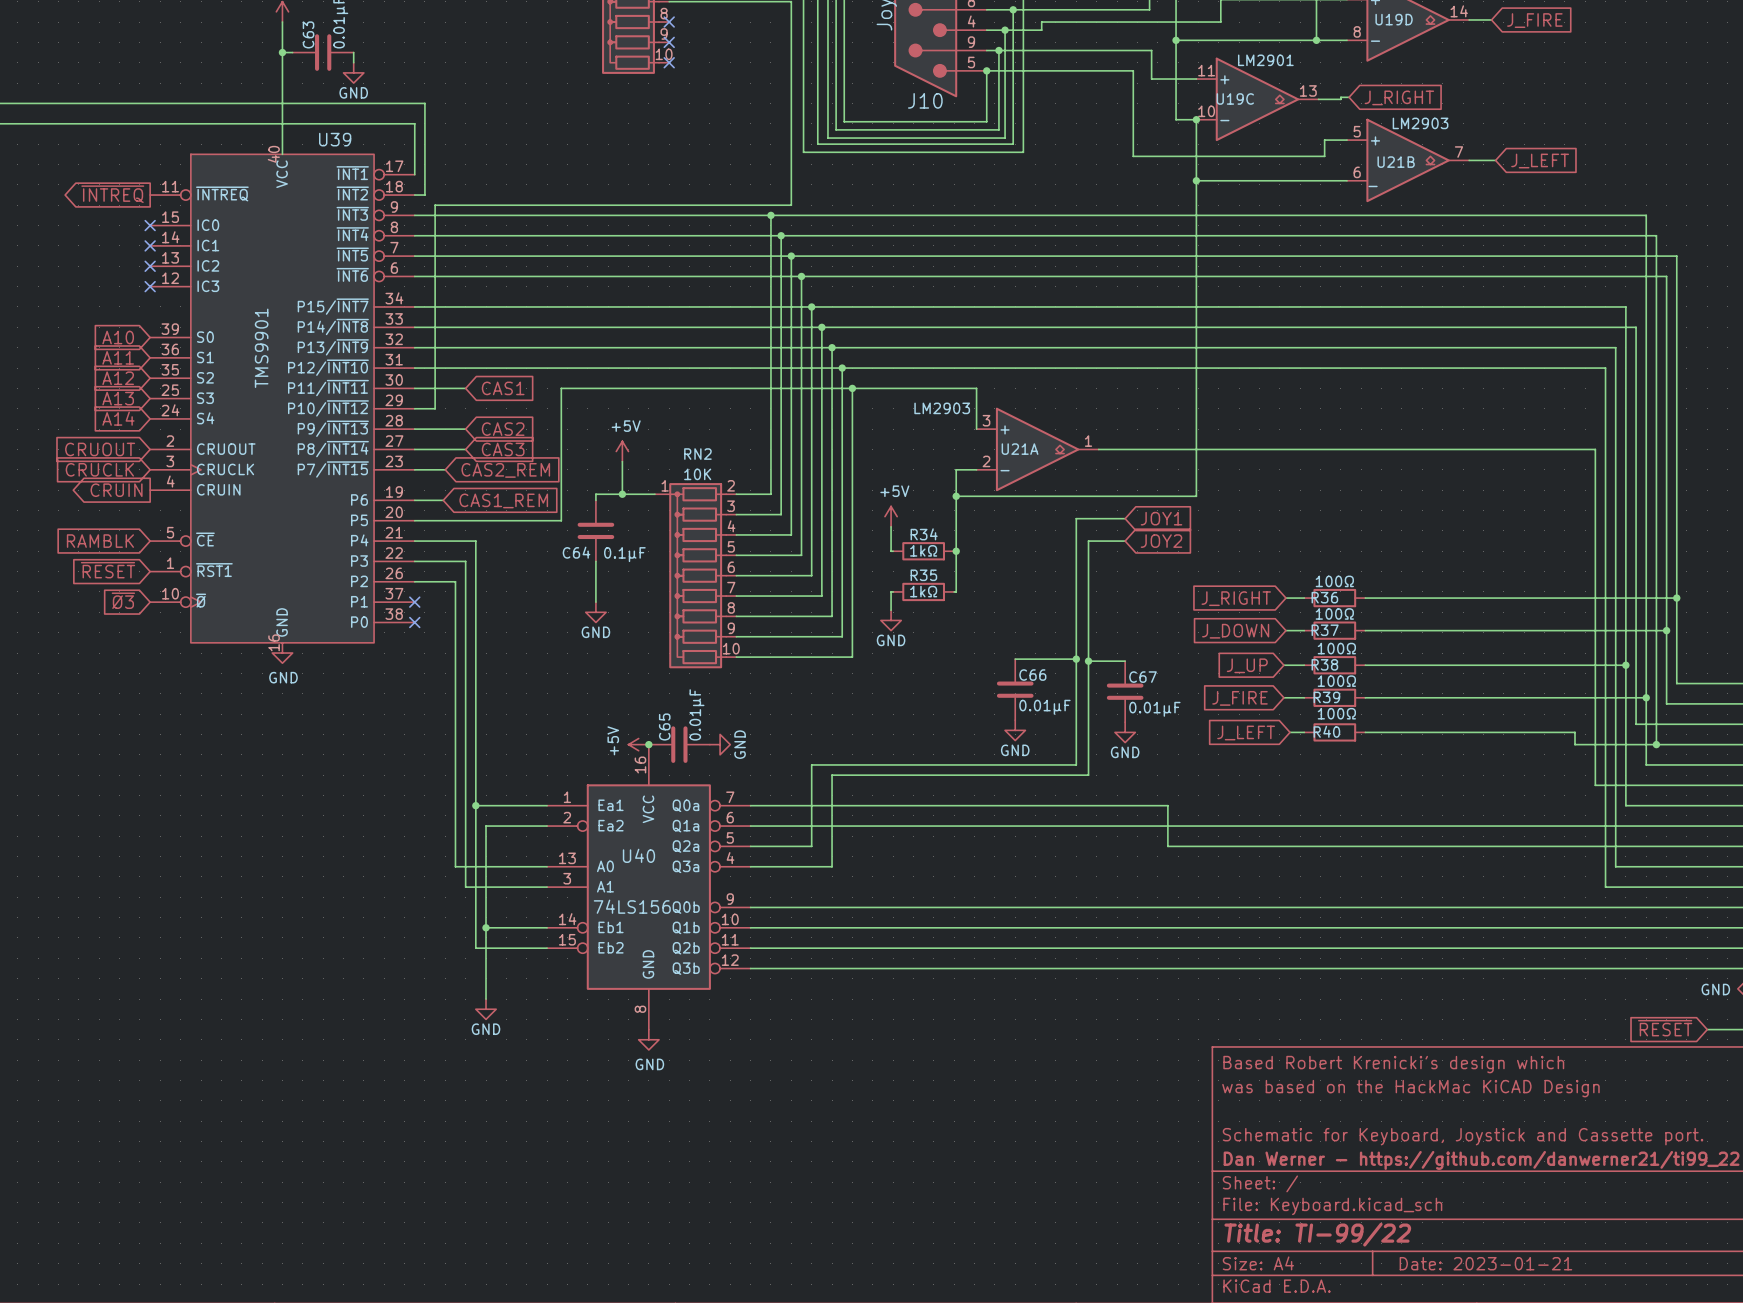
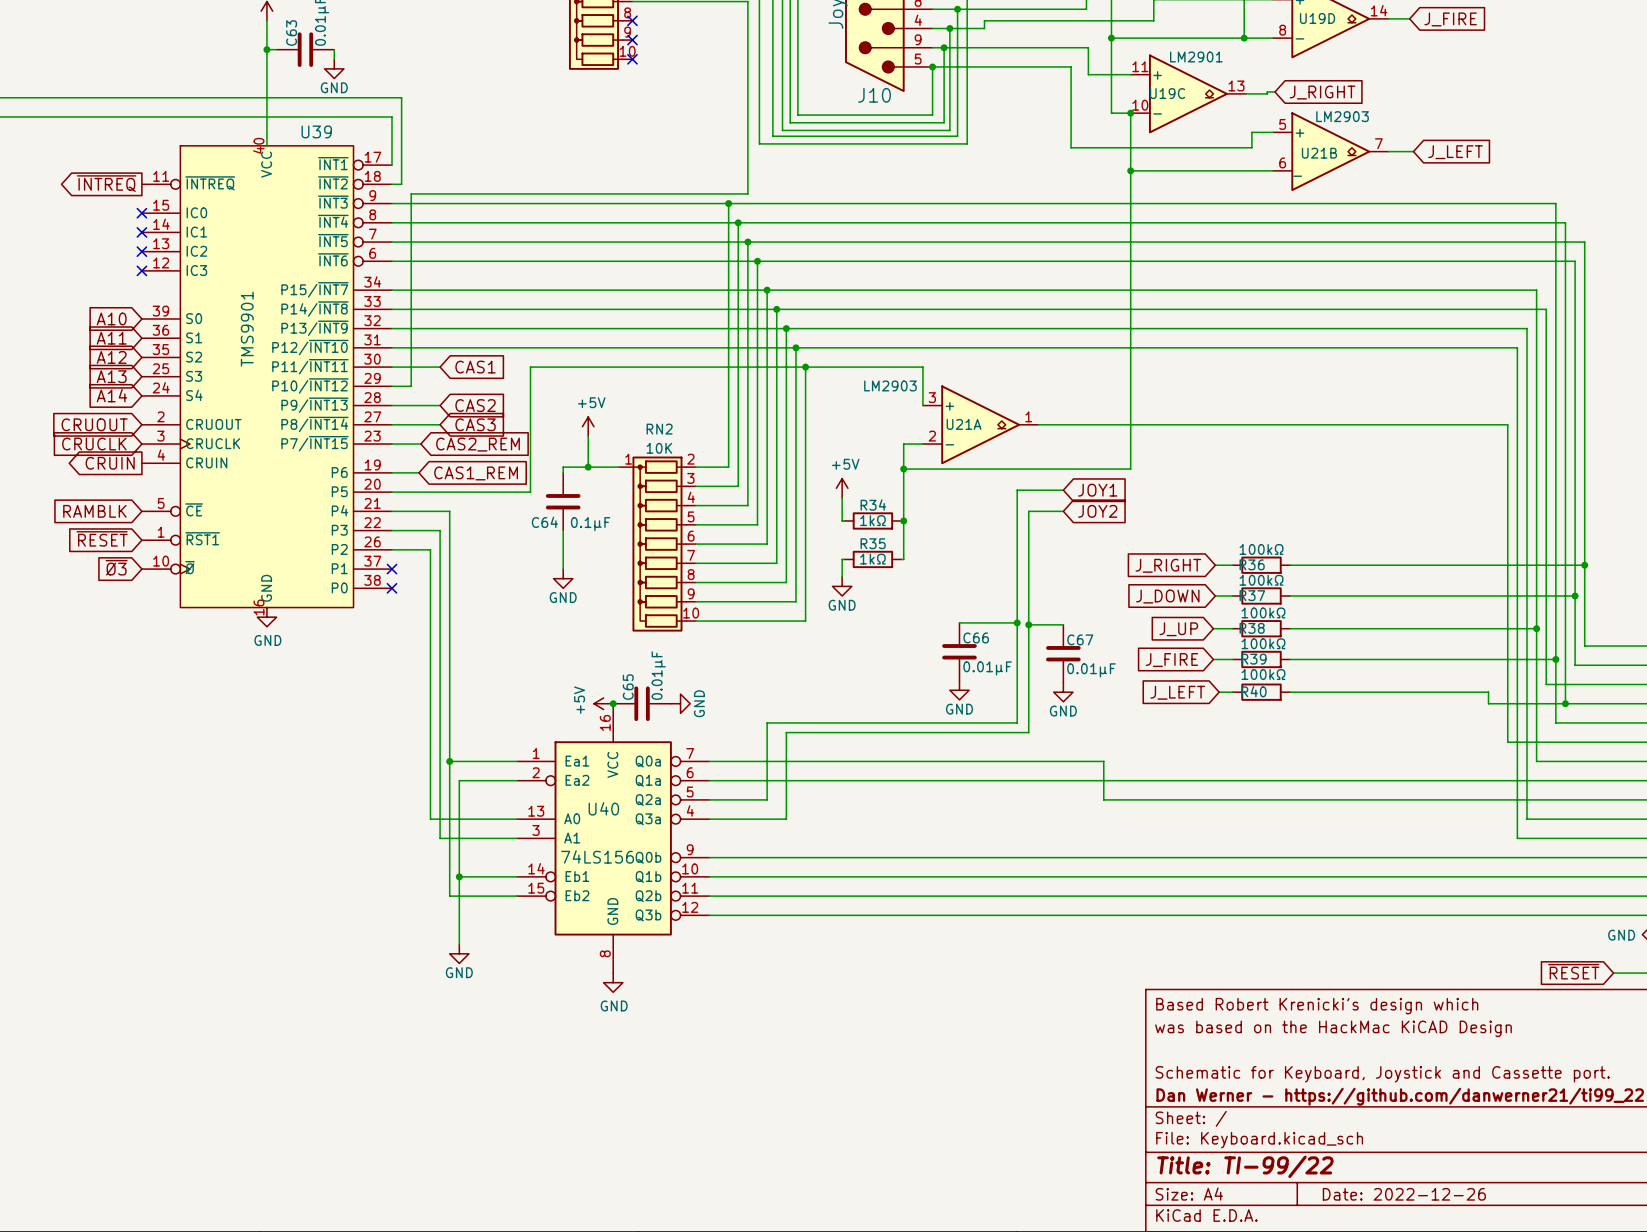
R36 value: 100Ω (1334, 581) -> 100kΩ (1261, 549)
R37 value: 100Ω (1334, 613) -> 100kΩ (1261, 580)
R38 value: 100Ω (1336, 648) -> 100kΩ (1263, 612)
R39 value: 100Ω (1336, 681) -> 100kΩ (1263, 643)
R40 value: 100Ω (1336, 713) -> 100kΩ (1263, 674)
title block: Date: 2023-01-21 (1485, 1263) -> Date: 2022-12-26 (1404, 1194)

